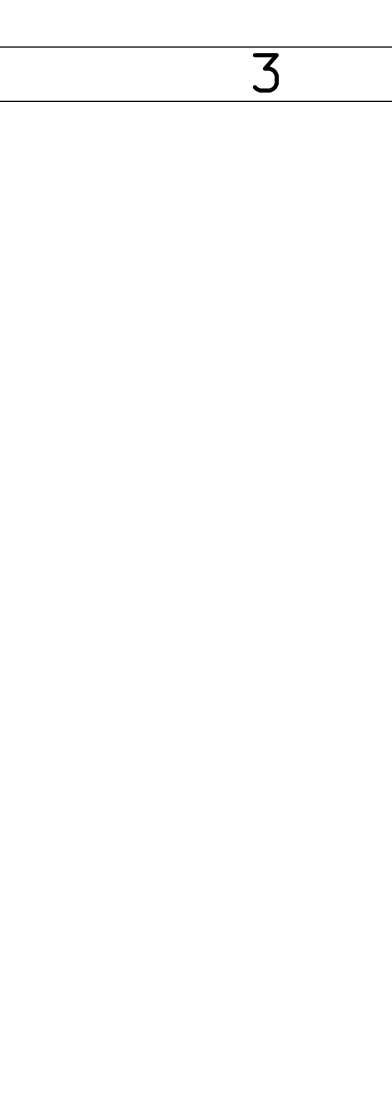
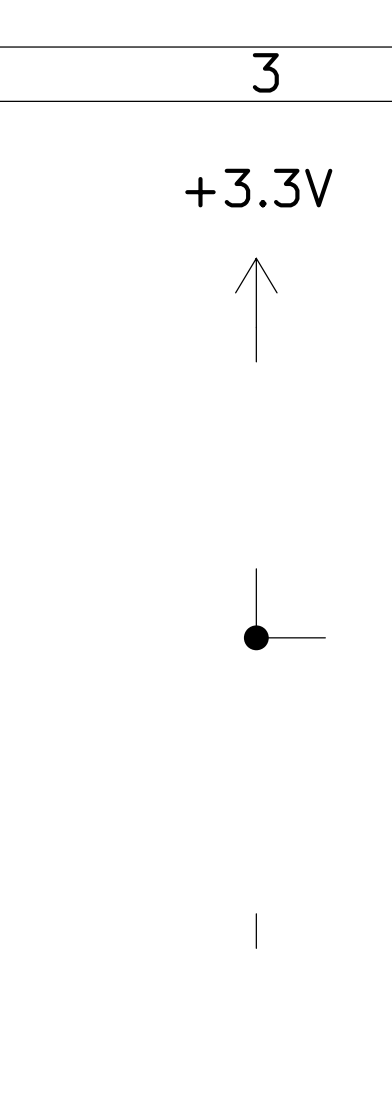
power symbol: none -> +3.3V (256, 292)
wire: none -> (256, 327) (256, 361)
wire: none -> (256, 568) (256, 637) (325, 637)
junction: none -> (256, 637)
wire: none -> (256, 913) (256, 948)

